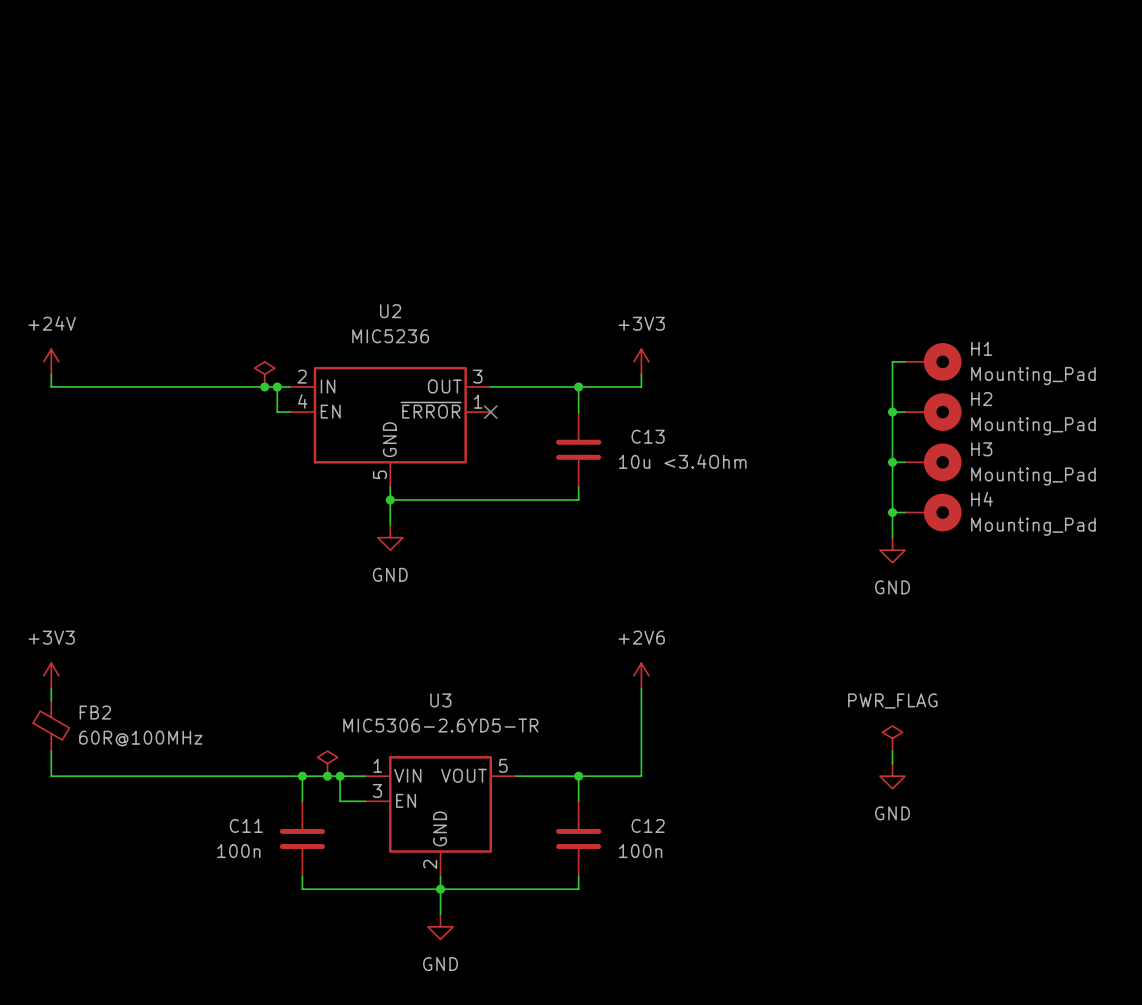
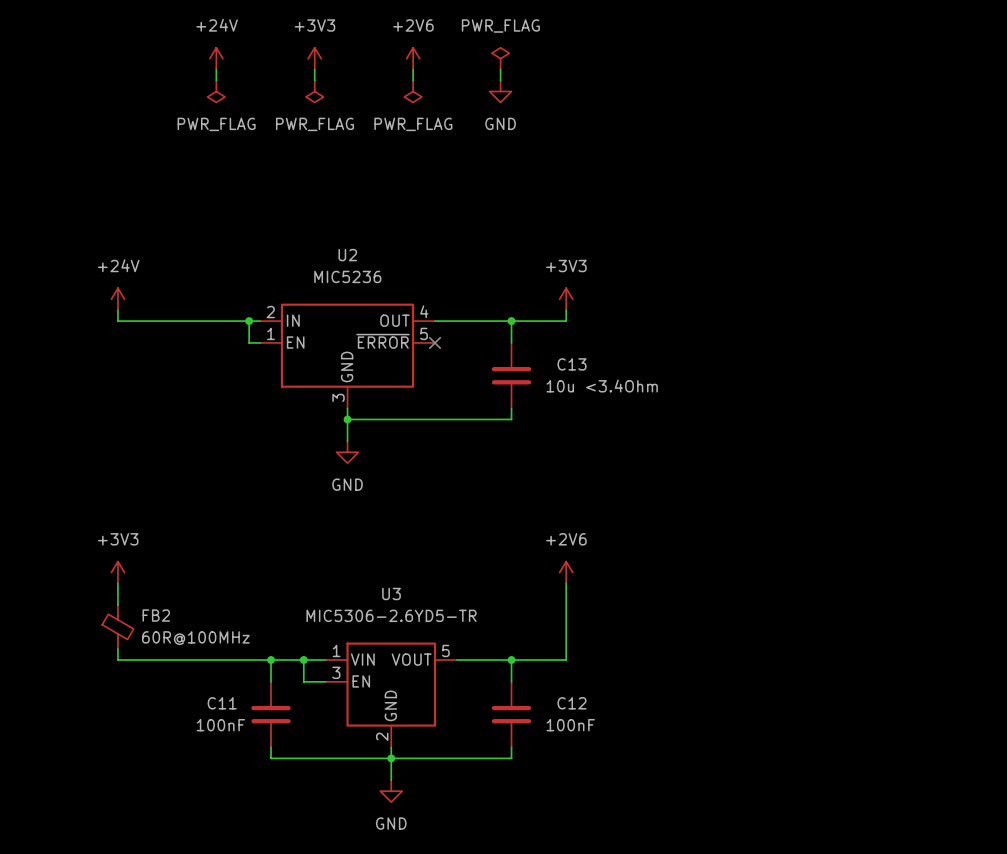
power symbol: none -> +24V (216, 58)
power symbol: none -> +3V3 (314, 58)
power symbol: none -> +2V6 (413, 58)
power symbol: none -> PWR_FLAG (500, 58)
wire: none -> (216, 69) (216, 80)
wire: none -> (314, 69) (314, 80)
wire: none -> (413, 69) (413, 80)
wire: none -> (500, 69) (500, 80)
power symbol: none -> PWR_FLAG (216, 91)
power symbol: none -> PWR_FLAG (314, 91)
power symbol: none -> PWR_FLAG (413, 91)
power symbol: none -> GND (500, 91)
power symbol position: +24V (51, 361) -> +24V (117, 299)
wire: (905, 361) (892, 361) (892, 537) -> none
H1: Mounting_Pad (933, 361) -> none
wire: (51, 374) (51, 386) (126, 386) -> (117, 310) (117, 321)
power symbol: (264, 374) -> none
U2 pin number: 3 (477, 376) -> 4 (424, 311)
junction: (264, 386) -> none
U2 pin number: 4 (302, 401) -> 1 (271, 333)
U2 pin number: 1 (478, 401) -> 5 (424, 333)
wire: (892, 412) (905, 412) -> none
junction: (892, 412) -> none
H2: Mounting_Pad (933, 412) -> none
wire: (892, 462) (905, 462) -> none
junction: (892, 462) -> none
H3: Mounting_Pad (933, 462) -> none
U2 pin number: 5 (379, 474) -> 3 (338, 397)
wire: (892, 512) (905, 512) -> none
junction: (892, 512) -> none
H4: Mounting_Pad (933, 512) -> none
power symbol: GND (892, 550) -> none
power symbol position: +3V3 (51, 675) -> +3V3 (117, 572)
wire: (51, 688) (51, 700) -> none
wire: none -> (117, 583) (117, 605)
FB2 position: (51, 725) -> (117, 627)
power symbol: PWR_FLAG (892, 738) -> none
wire: (51, 751) (51, 776) (126, 776) -> (117, 649) (117, 659)
wire: (892, 751) (892, 763) -> none
power symbol: (327, 763) -> none
junction: (327, 776) -> none
power symbol: GND (892, 776) -> none
C11 value: 100n (238, 851) -> 100nF (220, 725)
C12 value: 100n (640, 851) -> 100nF (570, 725)

